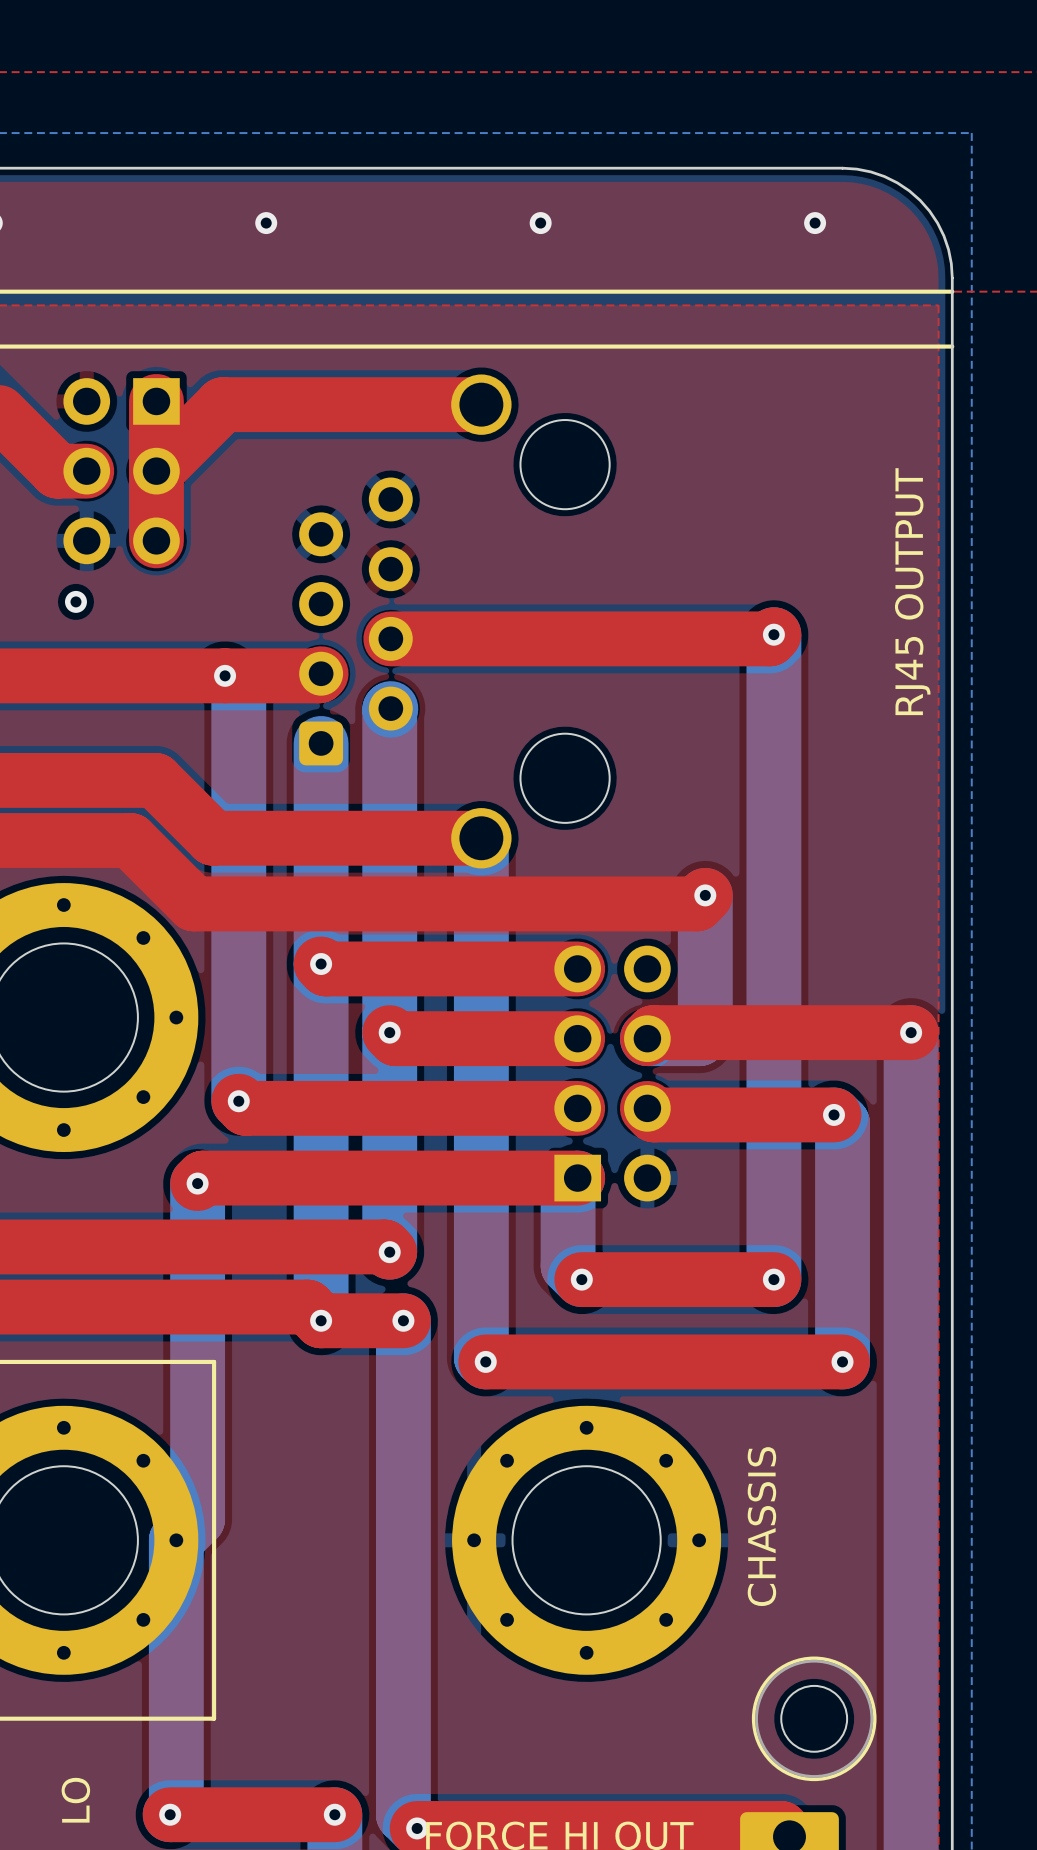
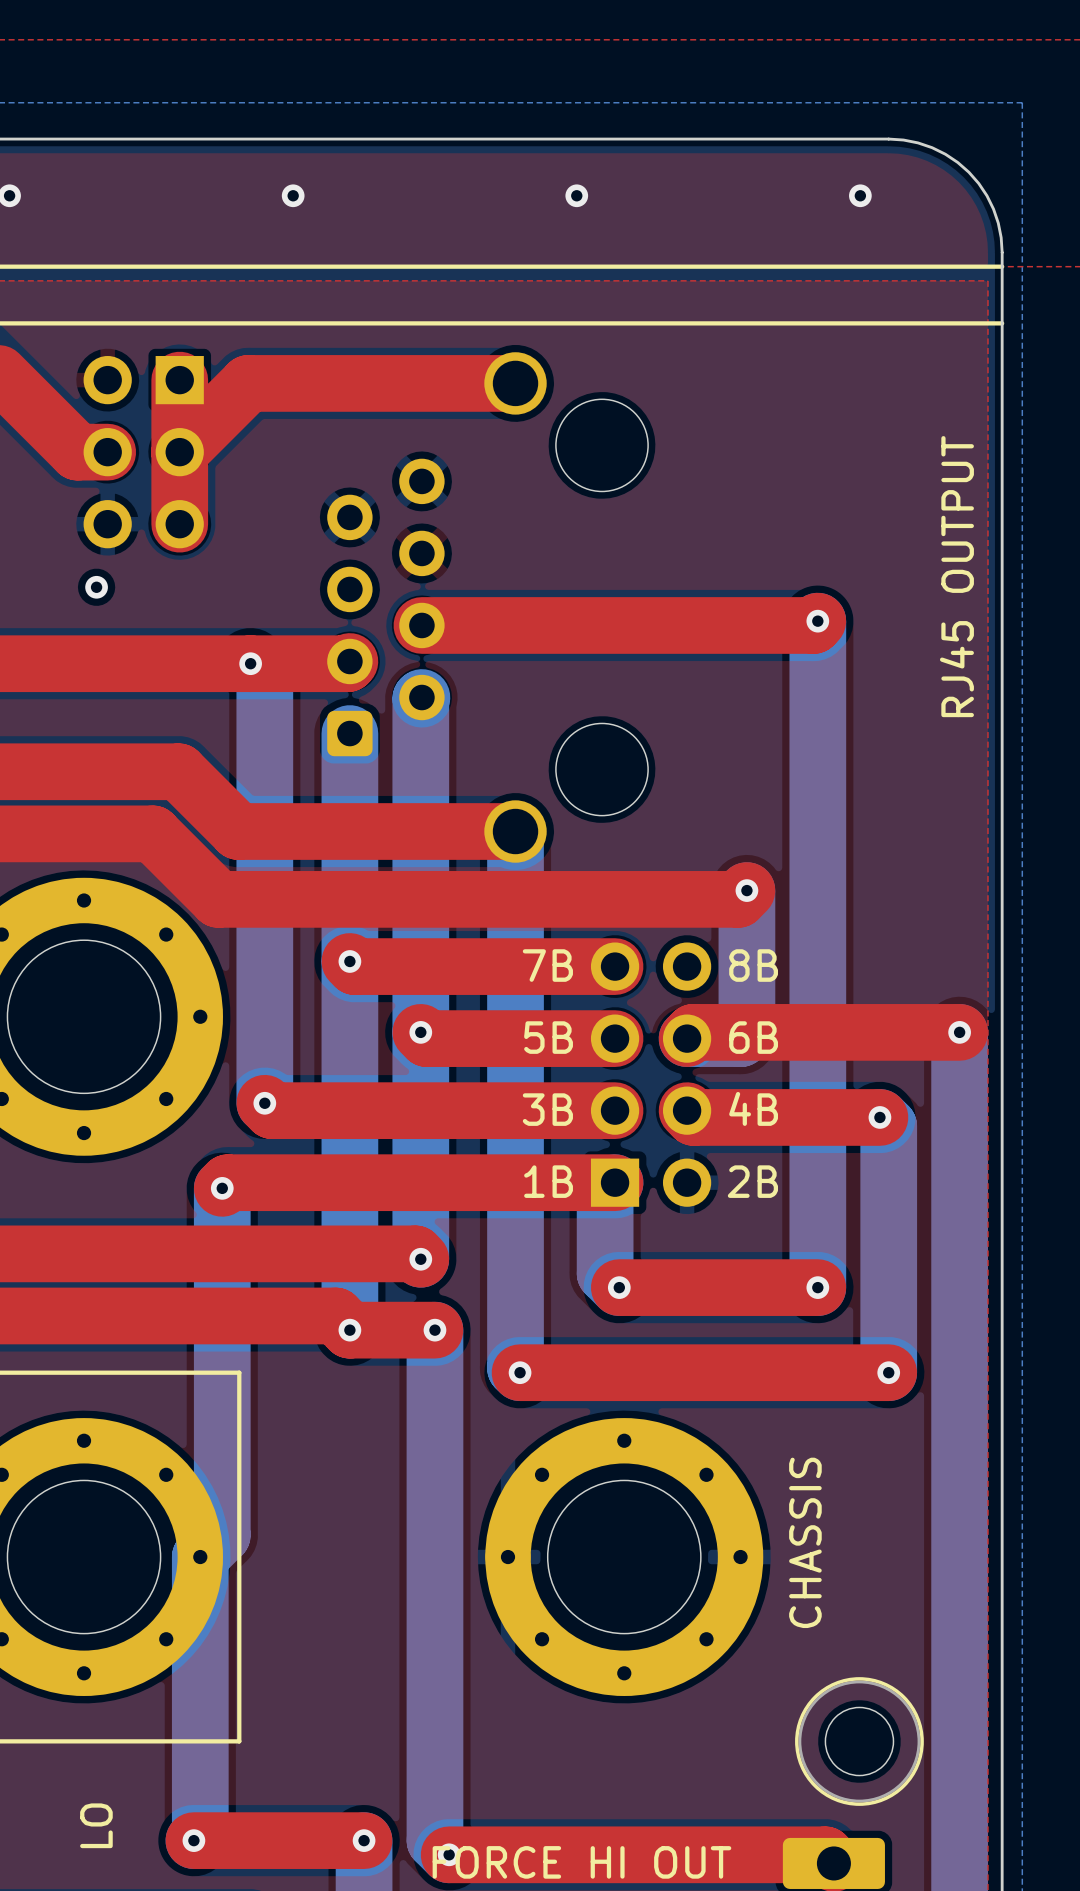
text: none -> 7B (547, 965)
text: none -> 8B (753, 965)
text: none -> 5B (548, 1037)
text: none -> 6B (753, 1037)
text: none -> 3B (547, 1109)
text: none -> 4B (753, 1108)
text: none -> 2B (752, 1181)
text: none -> 1B (548, 1181)

